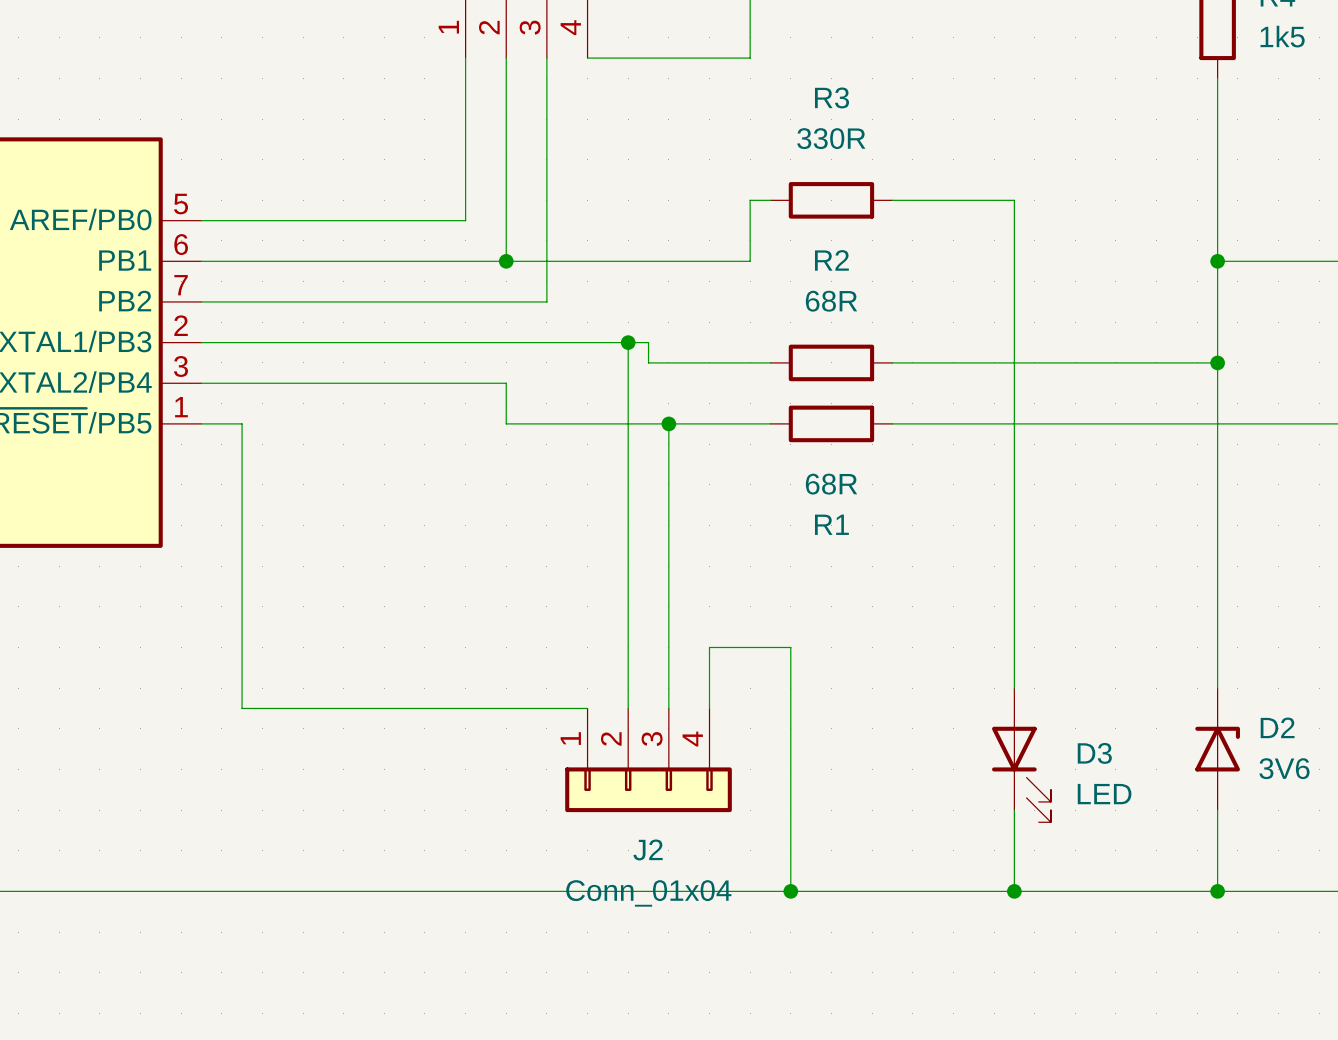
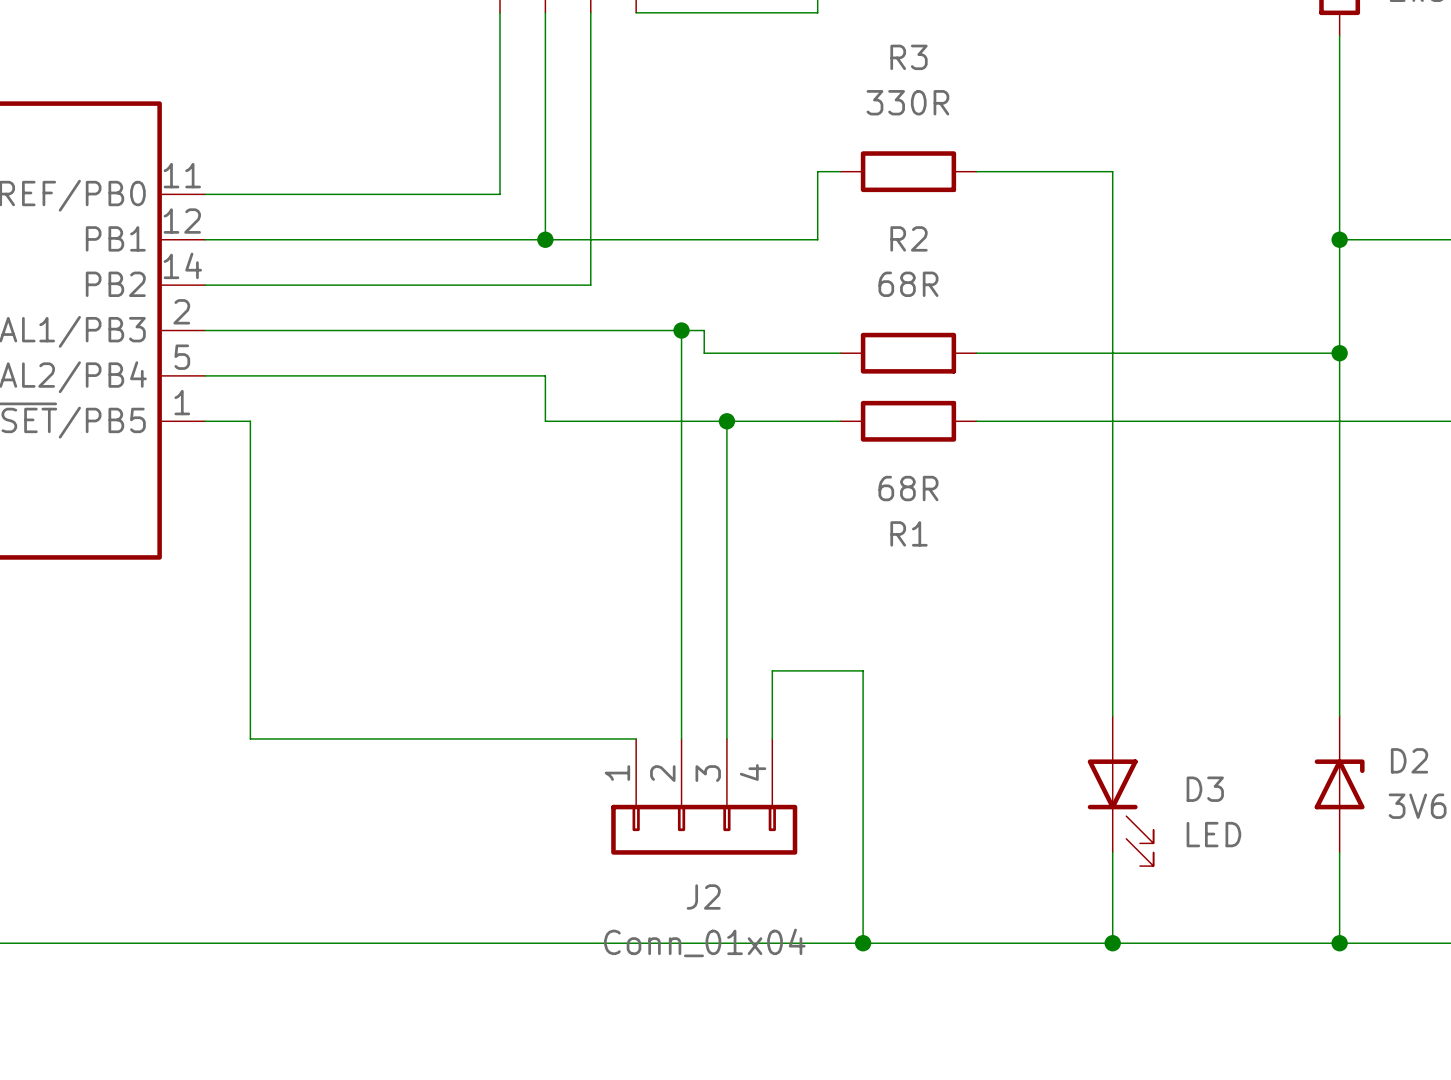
part pin number: 5 (181, 204) -> 11 (182, 175)
part pin number: 6 (181, 244) -> 12 (182, 221)
part pin number: 7 (181, 285) -> 14 (182, 265)
part pin number: 3 (180, 366) -> 5 (182, 357)

